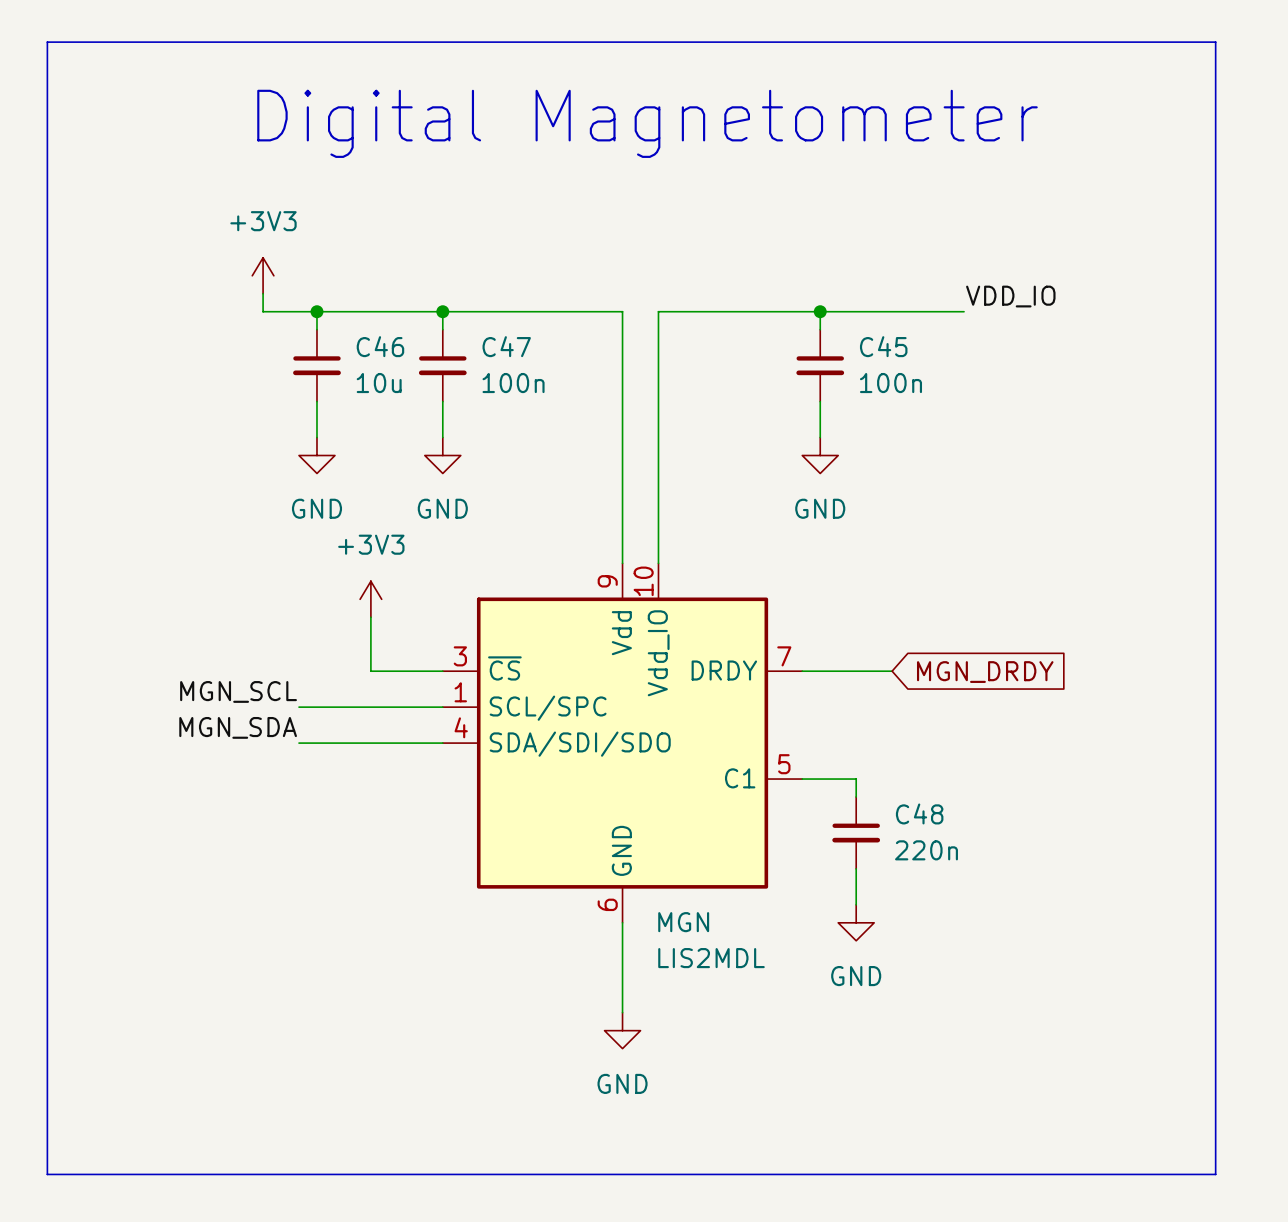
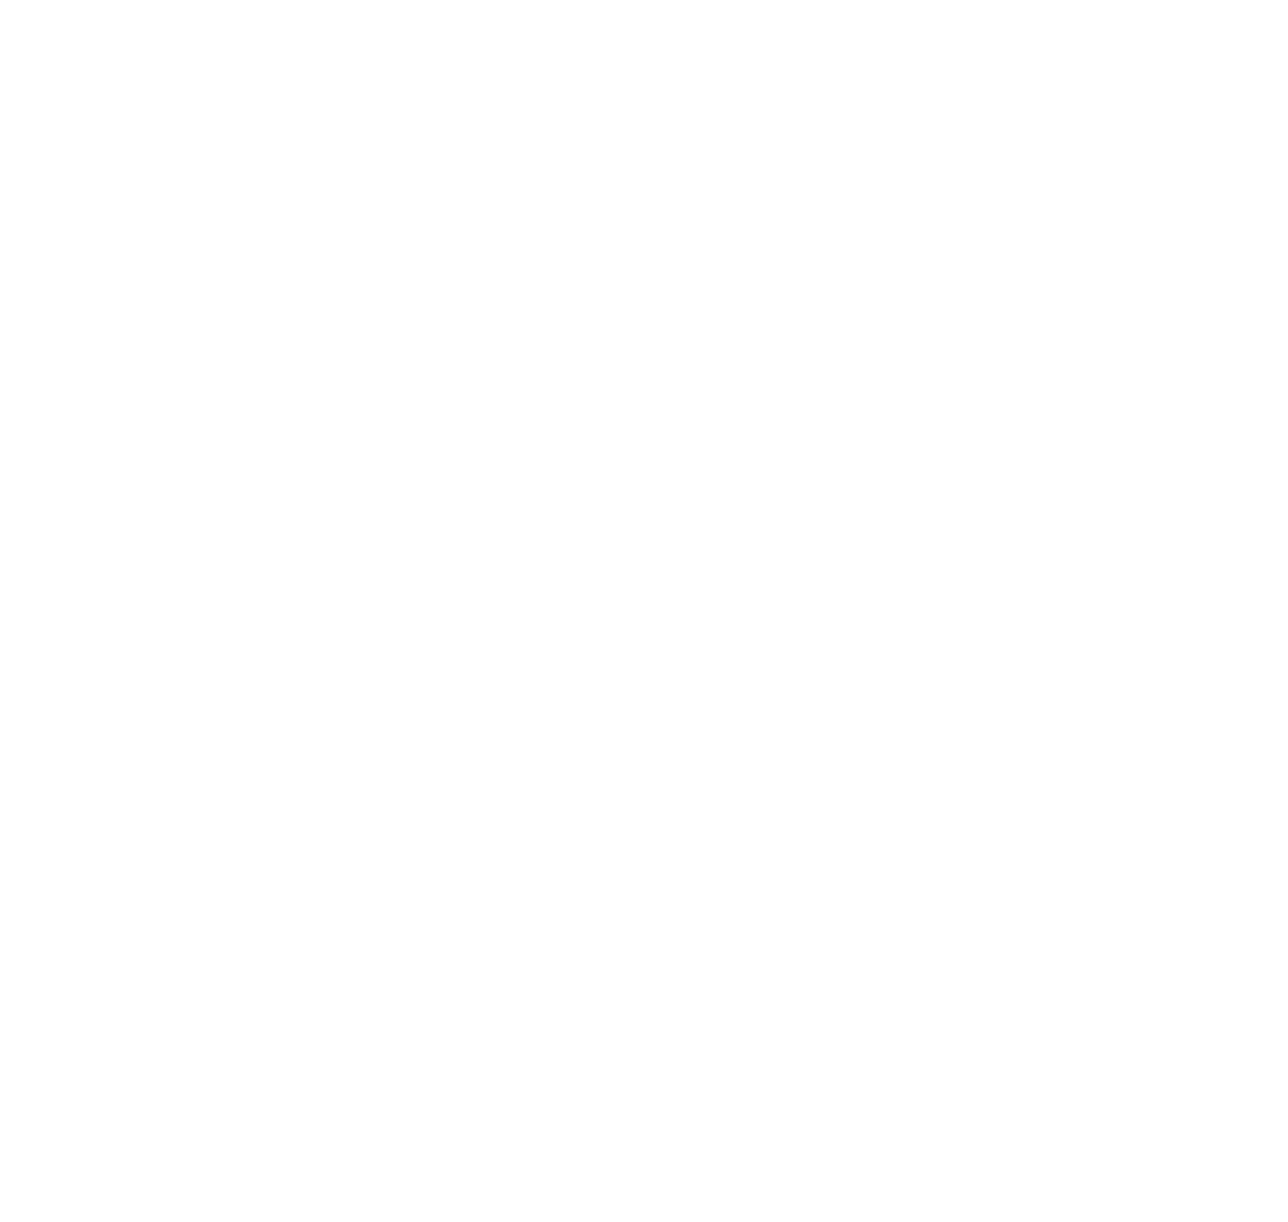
line: (47, 42) (1215, 42) (1215, 1174) (47, 1174) (47, 42) -> none
text: Digital Magnetometer (647, 123) -> none
power symbol: +3V3 (263, 275) -> none
wire: (263, 293) (263, 311) (622, 311) (622, 563) -> none
label: VDD_IO (1010, 296) -> none
wire: (316, 311) (316, 329) -> none
junction: (316, 311) -> none
wire: (442, 311) (442, 329) -> none
junction: (442, 311) -> none
wire: (820, 311) (820, 329) -> none
junction: (820, 311) -> none
wire: (964, 311) (658, 311) (658, 563) -> none
C46: 10u (316, 365) -> none
C47: 100n (442, 365) -> none
C45: 100n (820, 365) -> none
wire: (316, 401) (316, 437) -> none
wire: (442, 401) (442, 437) -> none
wire: (820, 401) (820, 437) -> none
power symbol: GND (316, 455) -> none
power symbol: GND (442, 455) -> none
power symbol: GND (820, 455) -> none
power symbol: +3V3 (370, 599) -> none
wire: (370, 617) (370, 671) (442, 671) -> none
wire: (802, 671) (892, 671) -> none
global label: MGN_DRDY (985, 672) -> none
label: MGN_SCL (238, 691) -> none
wire: (299, 707) (442, 707) -> none
label: MGN_SDA (238, 727) -> none
wire: (299, 743) (442, 743) -> none
MGN: LIS2MDL (622, 743) -> none
wire: (802, 779) (856, 779) (856, 797) -> none
C48: 220n (856, 832) -> none
wire: (856, 868) (856, 904) -> none
wire: (622, 922) (622, 1012) -> none
power symbol: GND (856, 922) -> none
power symbol: GND (622, 1030) -> none

